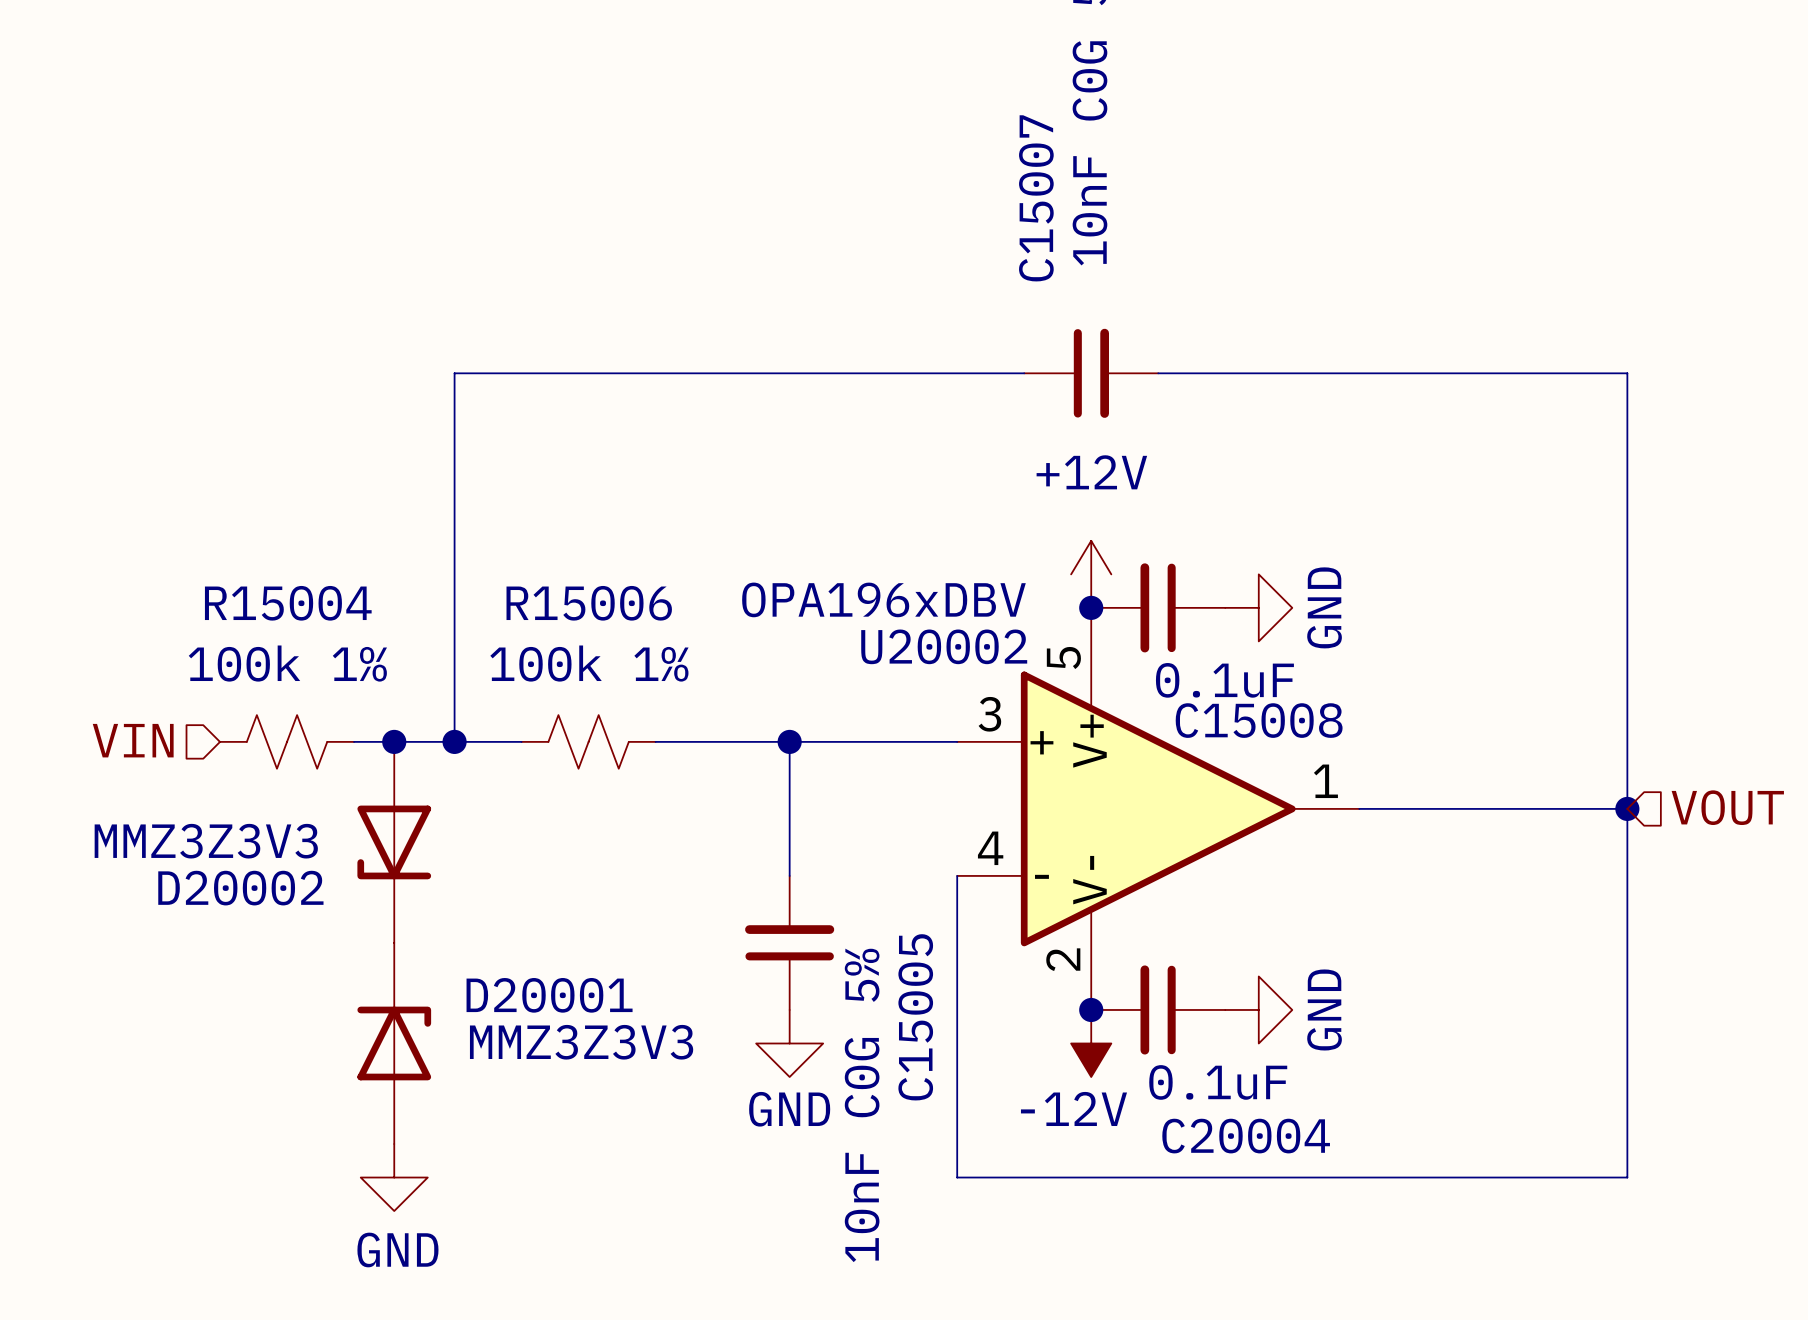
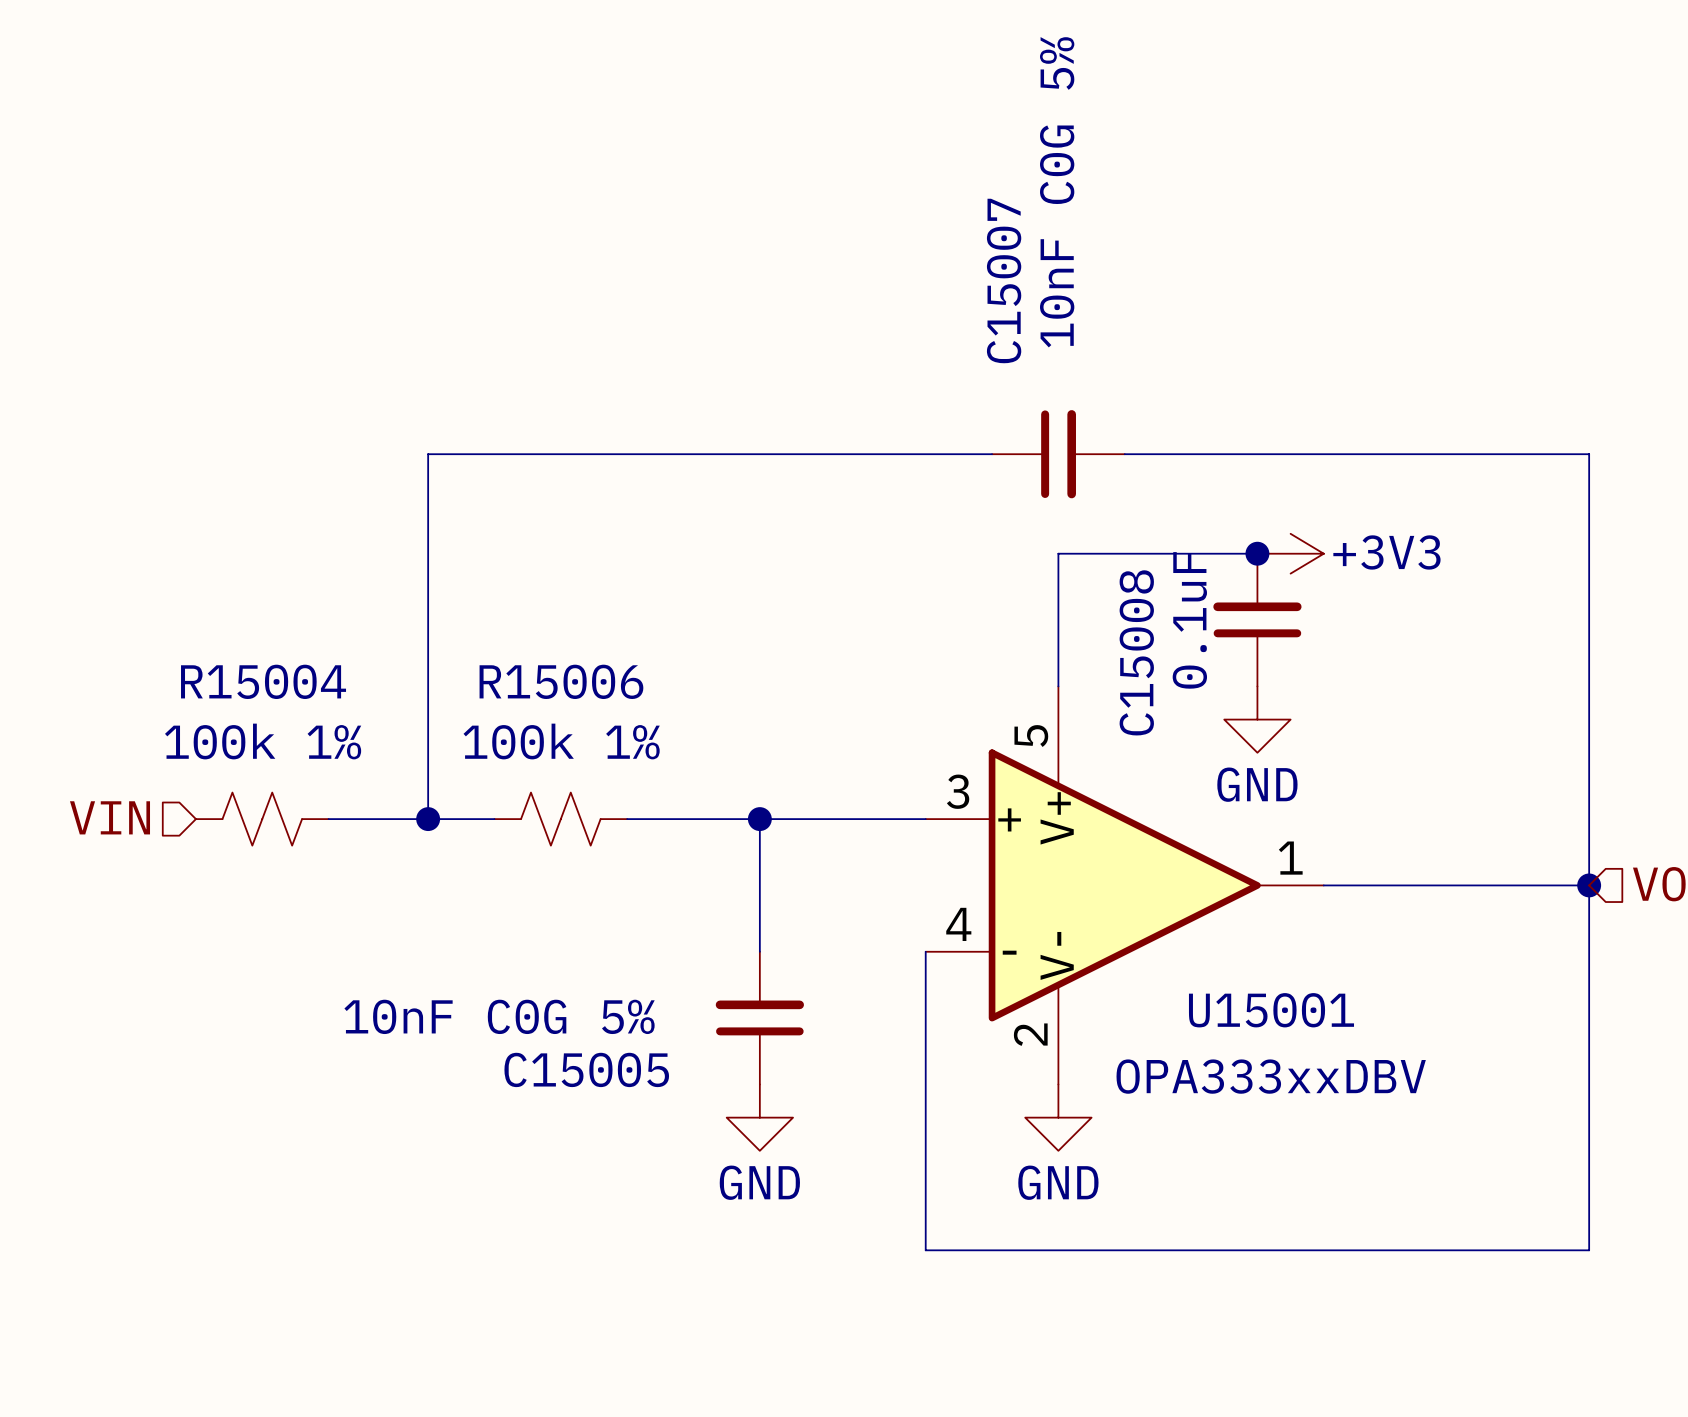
wire: none -> (1257, 553) (1058, 553) (1058, 686)
junction: none -> (1257, 553)
power symbol: none -> +3V3 (1290, 553)
power symbol: +12V (1091, 574) -> none
U20002 value: OPA196xDBV (883, 599) -> OPA333xxDBV (1271, 1076)
junction: (1091, 607) -> none
C15008 rotation: 0° (1158, 607) -> 90° clockwise (1257, 619)
C15008 position: (1158, 607) -> (1257, 620)
power symbol rotation: 0° (1258, 607) -> 90° clockwise (1257, 719)
power symbol position: GND (1258, 607) -> GND (1257, 719)
U20002 name: U20002 (944, 646) -> U15001 (1271, 1010)
C15008 value position: 0.1uF (1224, 680) -> 0.1uF (1189, 620)
C15008 name position: C15008 (1259, 720) -> C15008 (1136, 652)
junction: (394, 741) -> none
D20002: MMZ3Z3V3 (394, 842) -> none
junction: (1091, 1009) -> none
C20004: 0.1uF (1158, 1009) -> none
power symbol: GND (1258, 1009) -> none
C15005 name rotation: 0° (915, 1017) -> 90° clockwise (586, 1069)
C15005 name position: C15005 (915, 1017) -> C15005 (586, 1069)
D20001: MMZ3Z3V3 (394, 1043) -> none
power symbol: -12V (1091, 1043) -> GND (1058, 1117)
C15005 value rotation: 0° (862, 1105) -> 90° clockwise (499, 1016)
power symbol: GND (394, 1177) -> none

